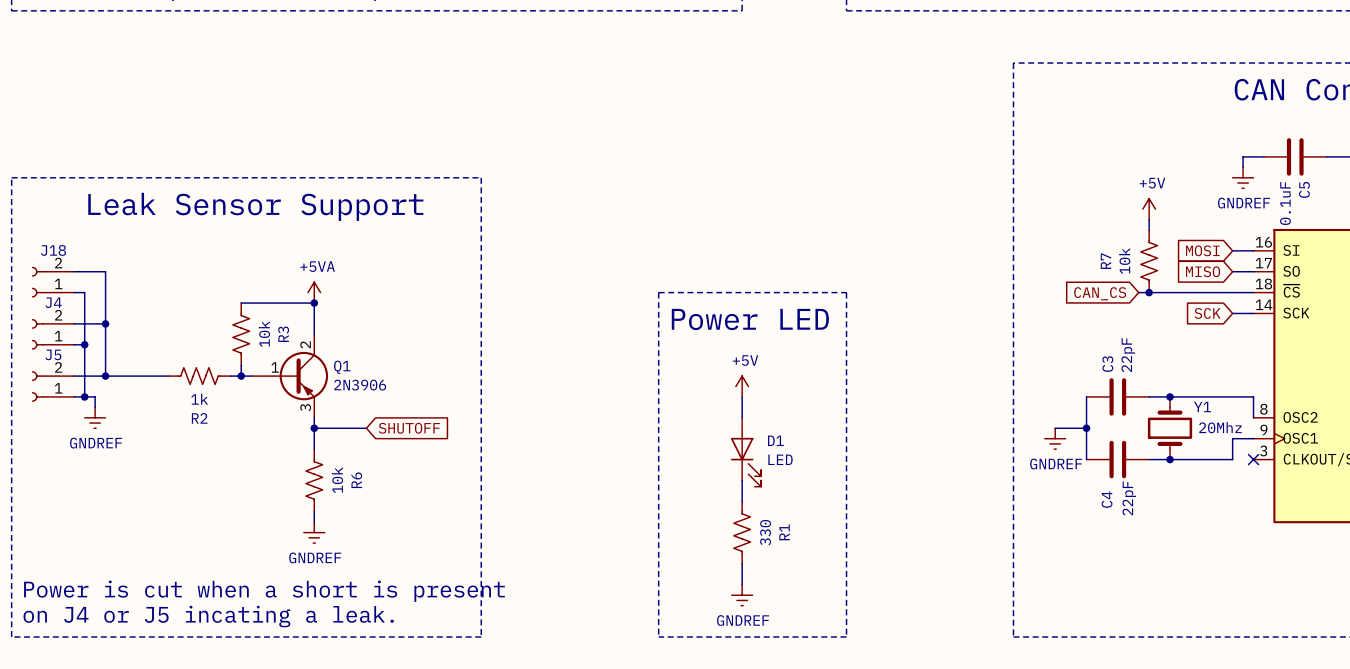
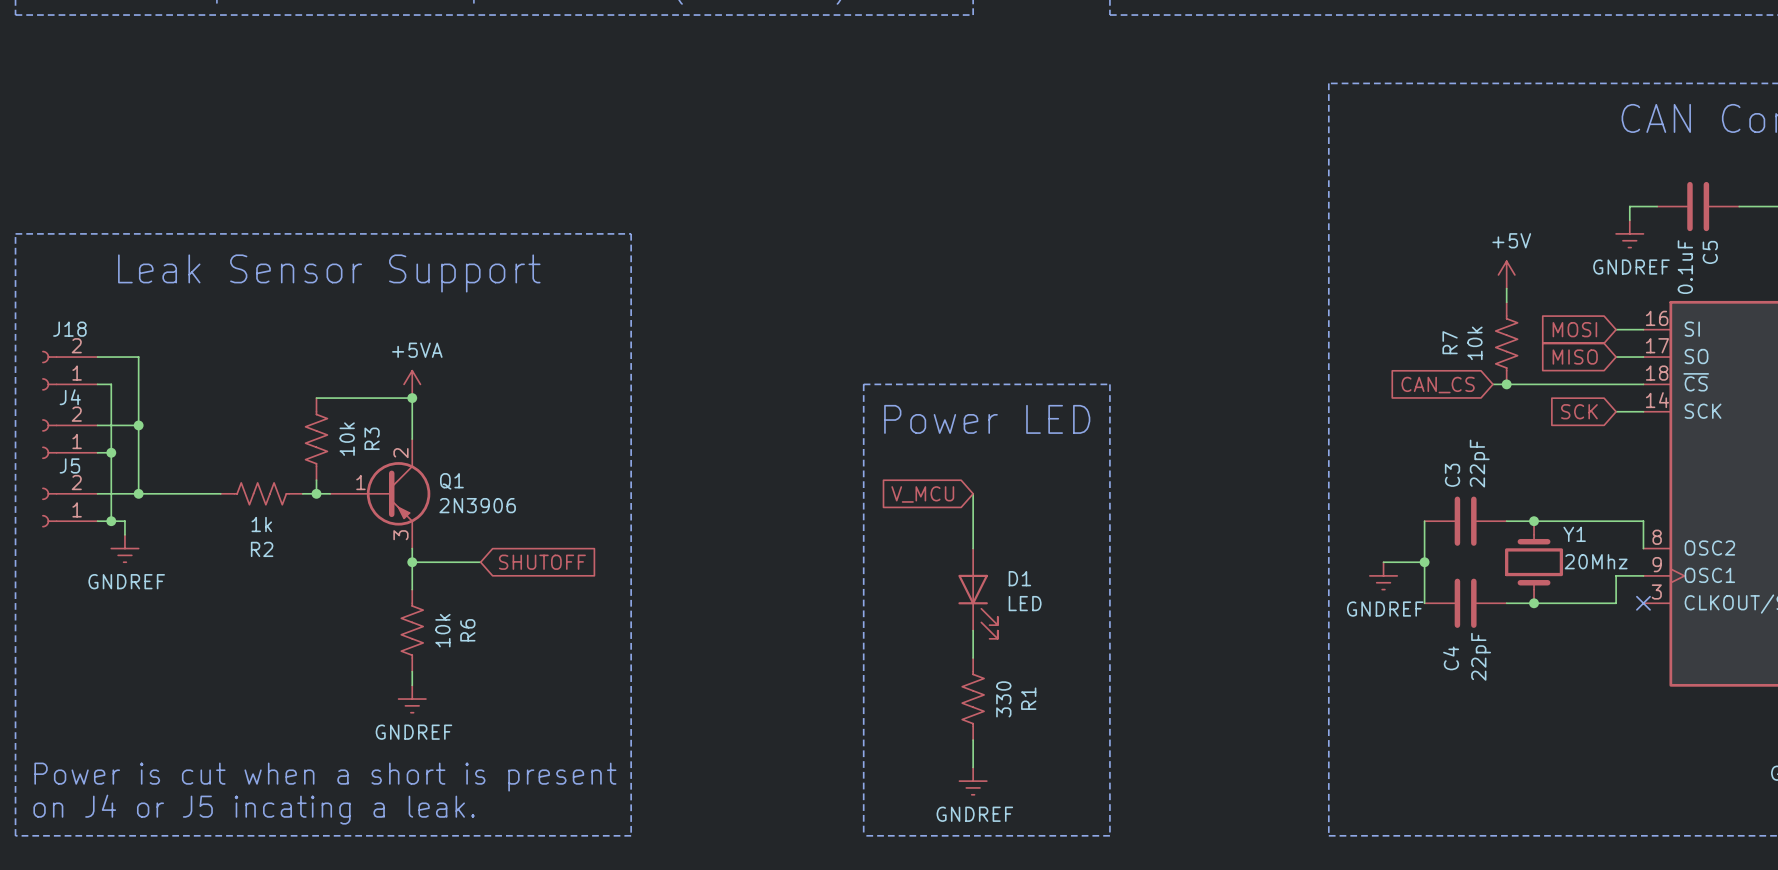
global label: none -> V_MCU (922, 494)
power symbol: +5V (742, 386) -> none

